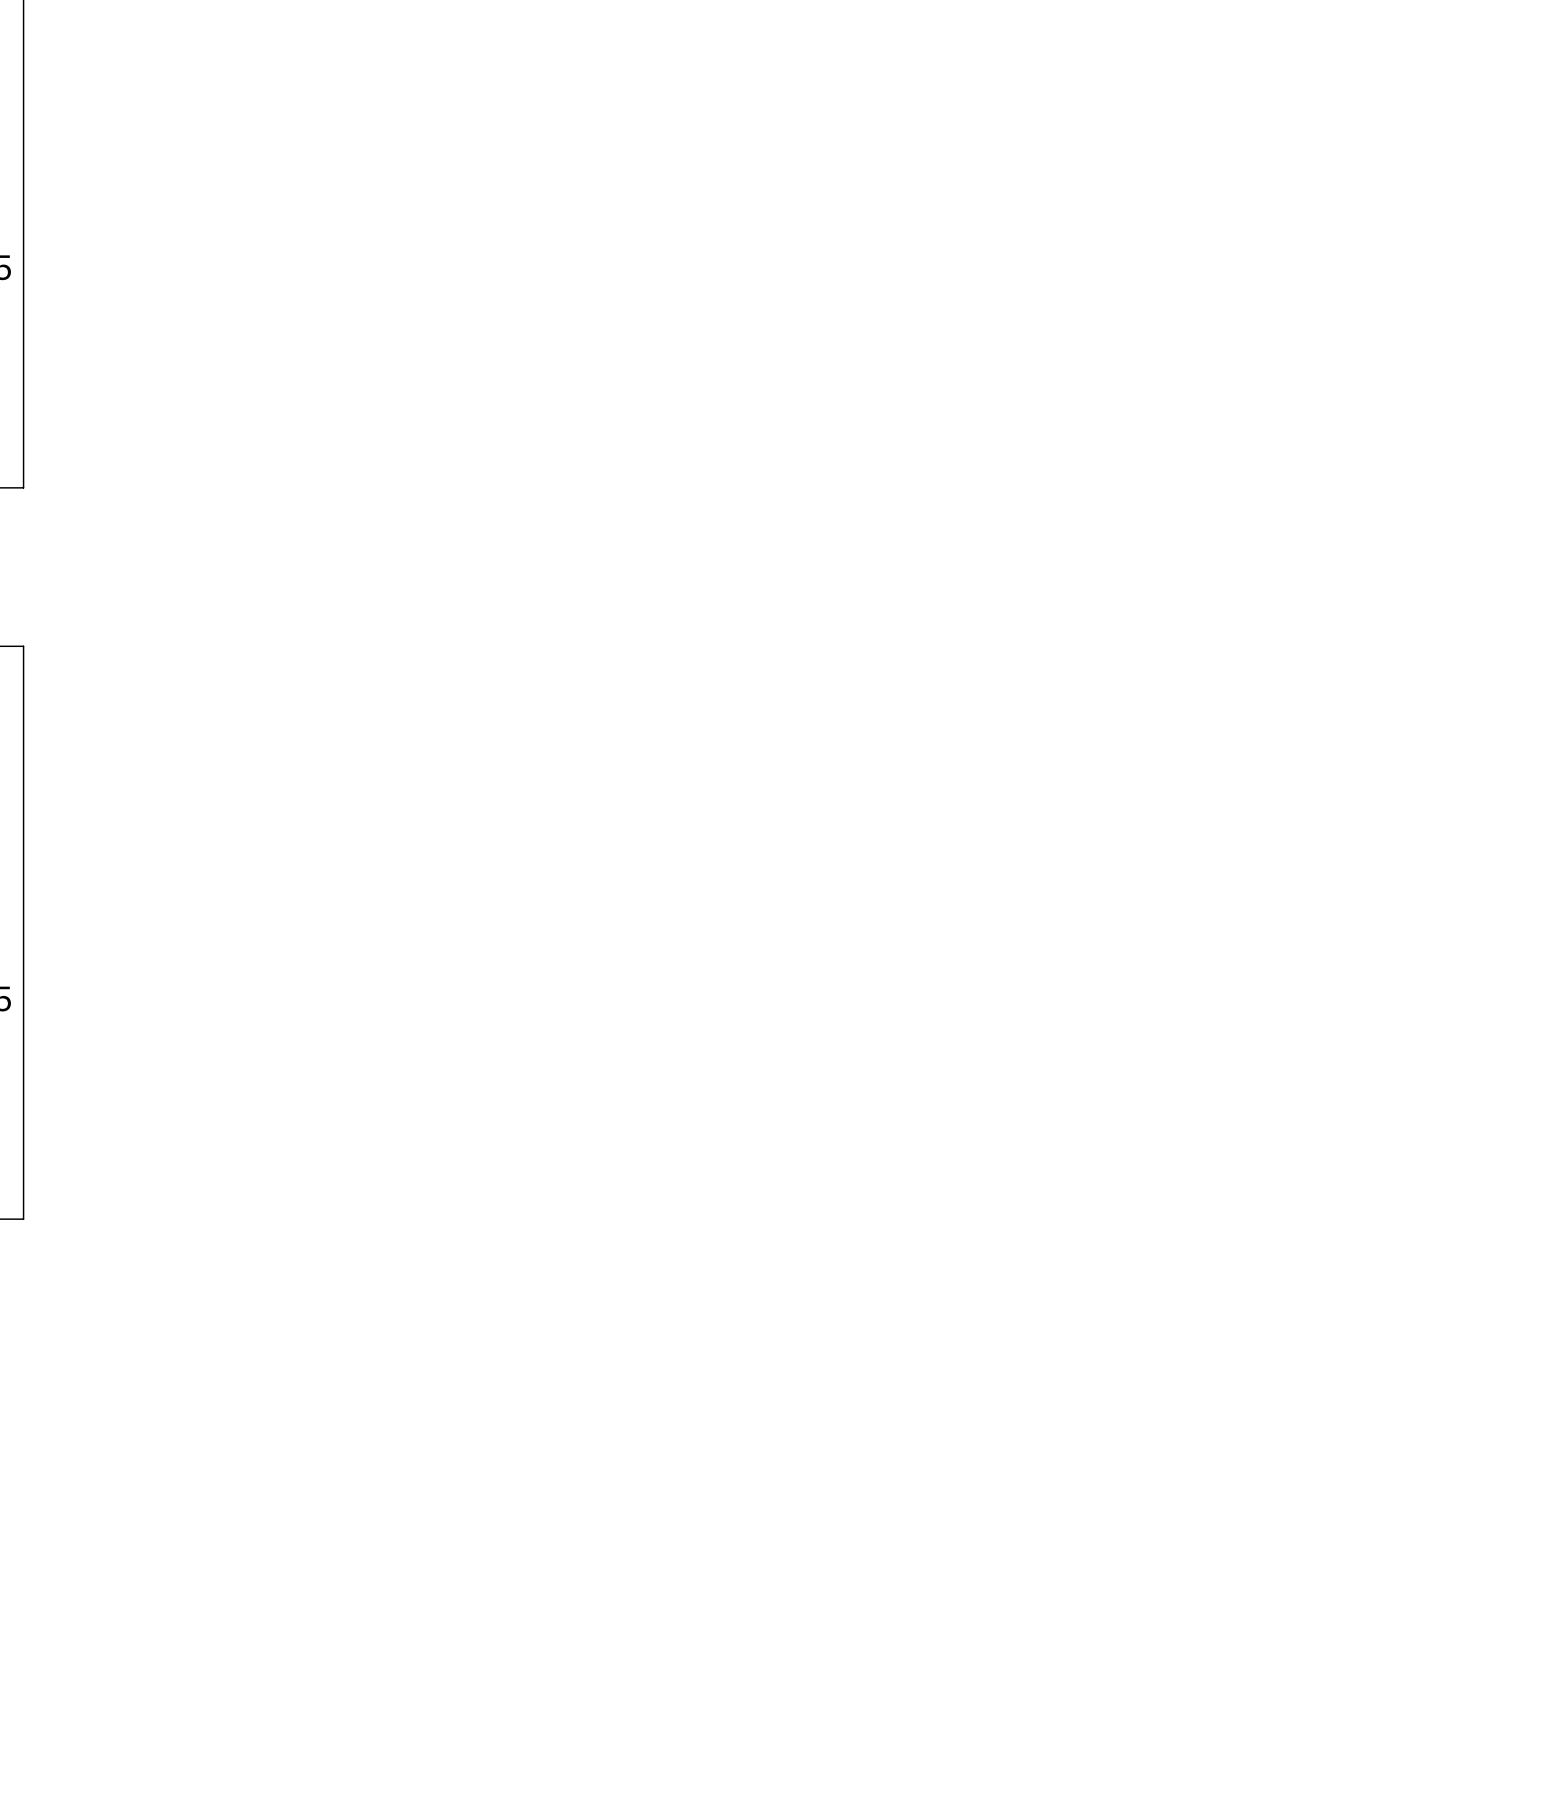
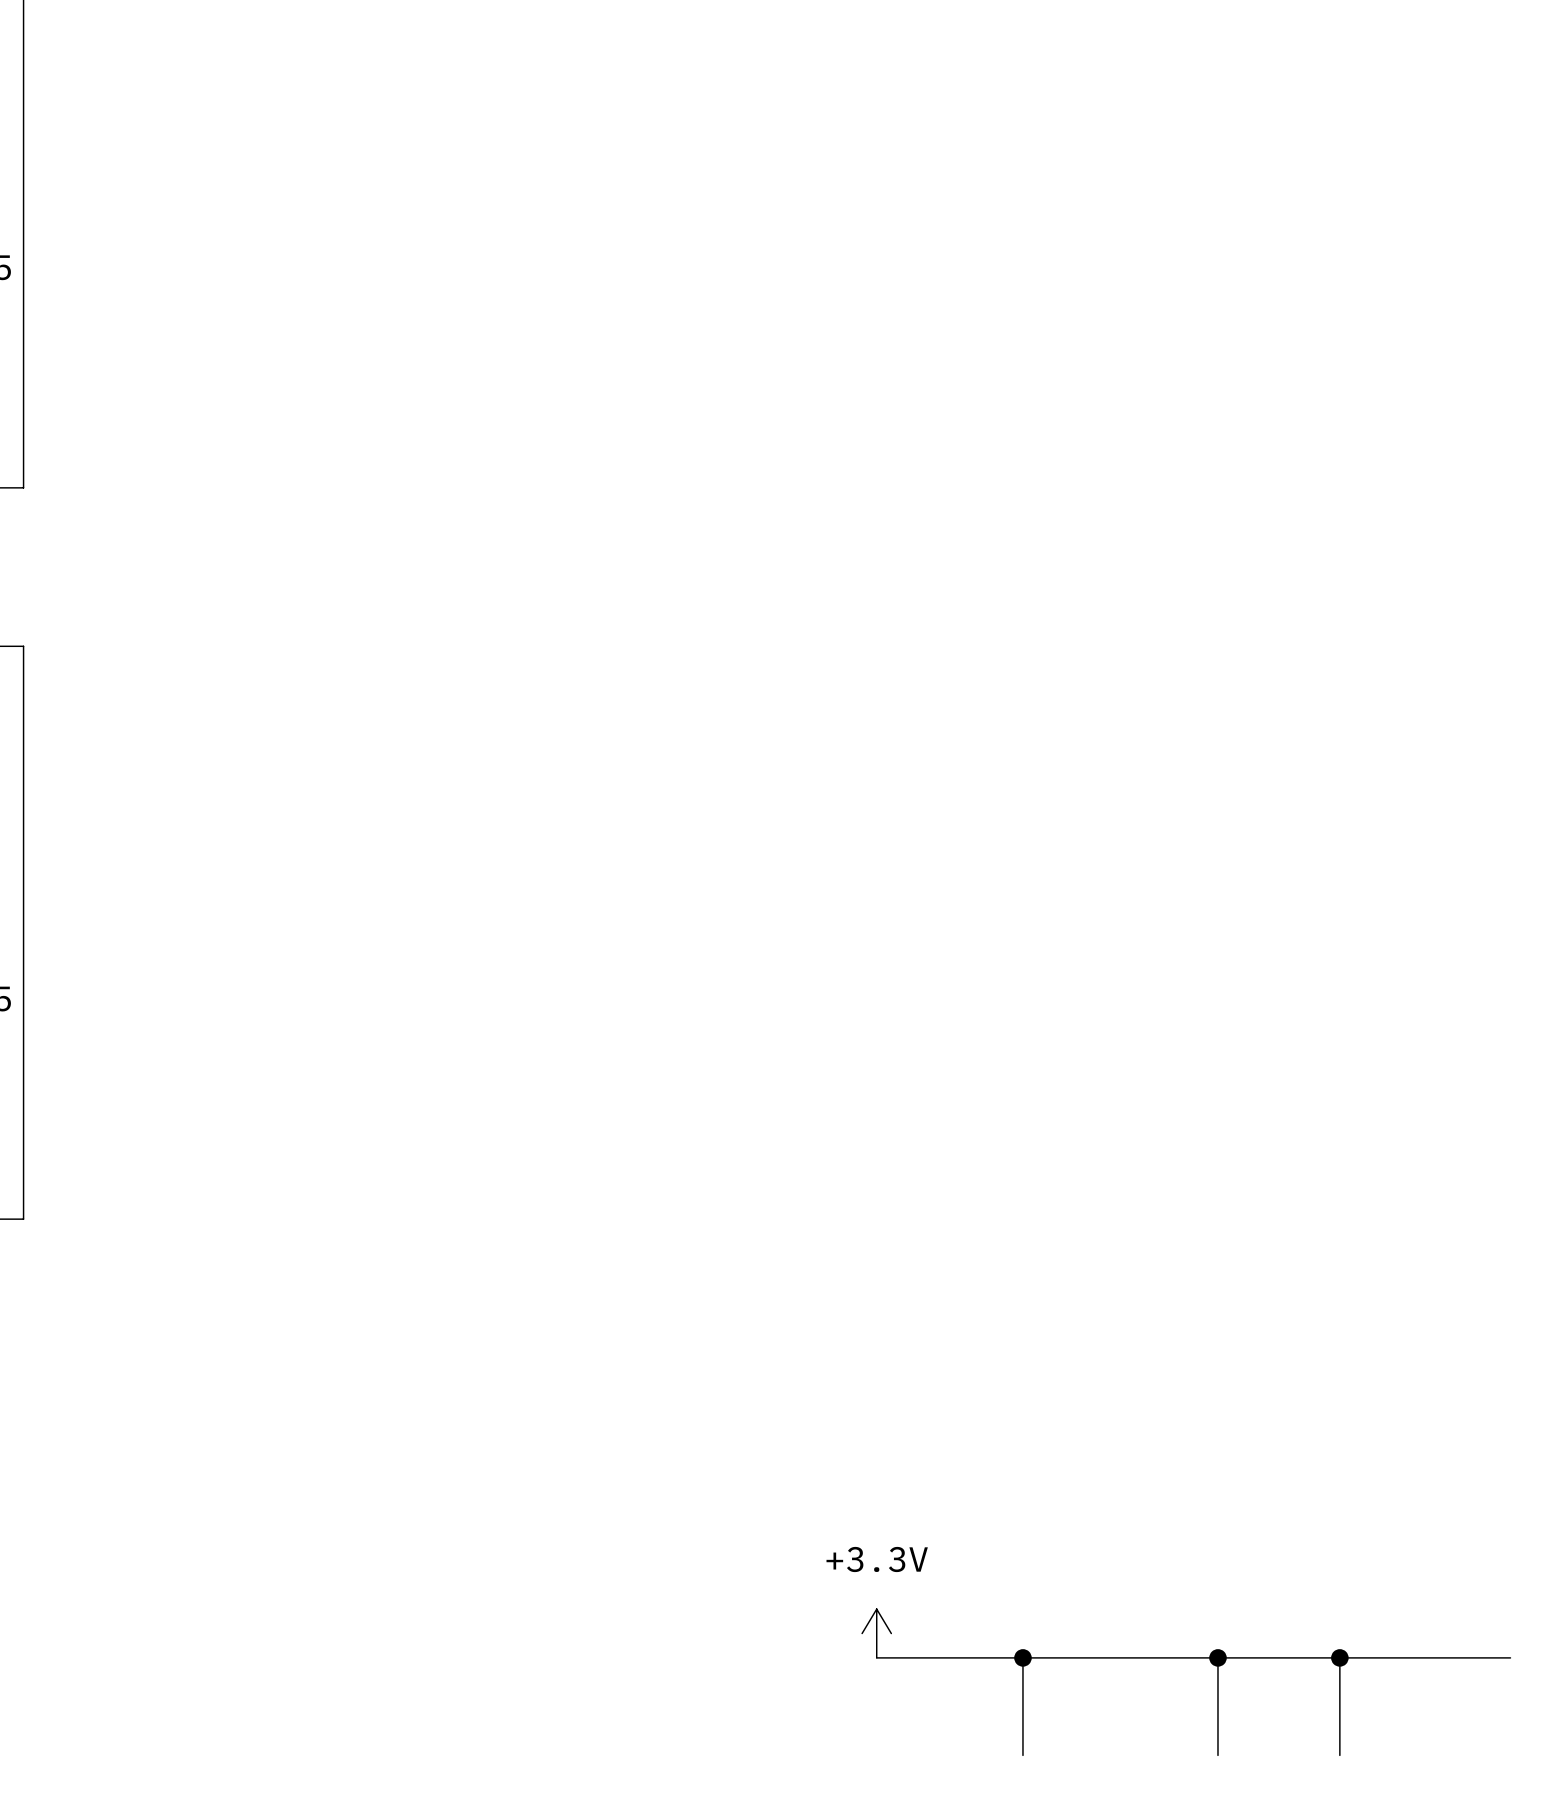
power symbol: none -> +3.3V (876, 1633)
wire: none -> (876, 1657) (1510, 1657)
wire: none -> (1022, 1657) (1022, 1755)
junction: none -> (1022, 1657)
wire: none -> (1217, 1657) (1217, 1755)
junction: none -> (1217, 1657)
wire: none -> (1339, 1657) (1339, 1755)
junction: none -> (1339, 1657)

